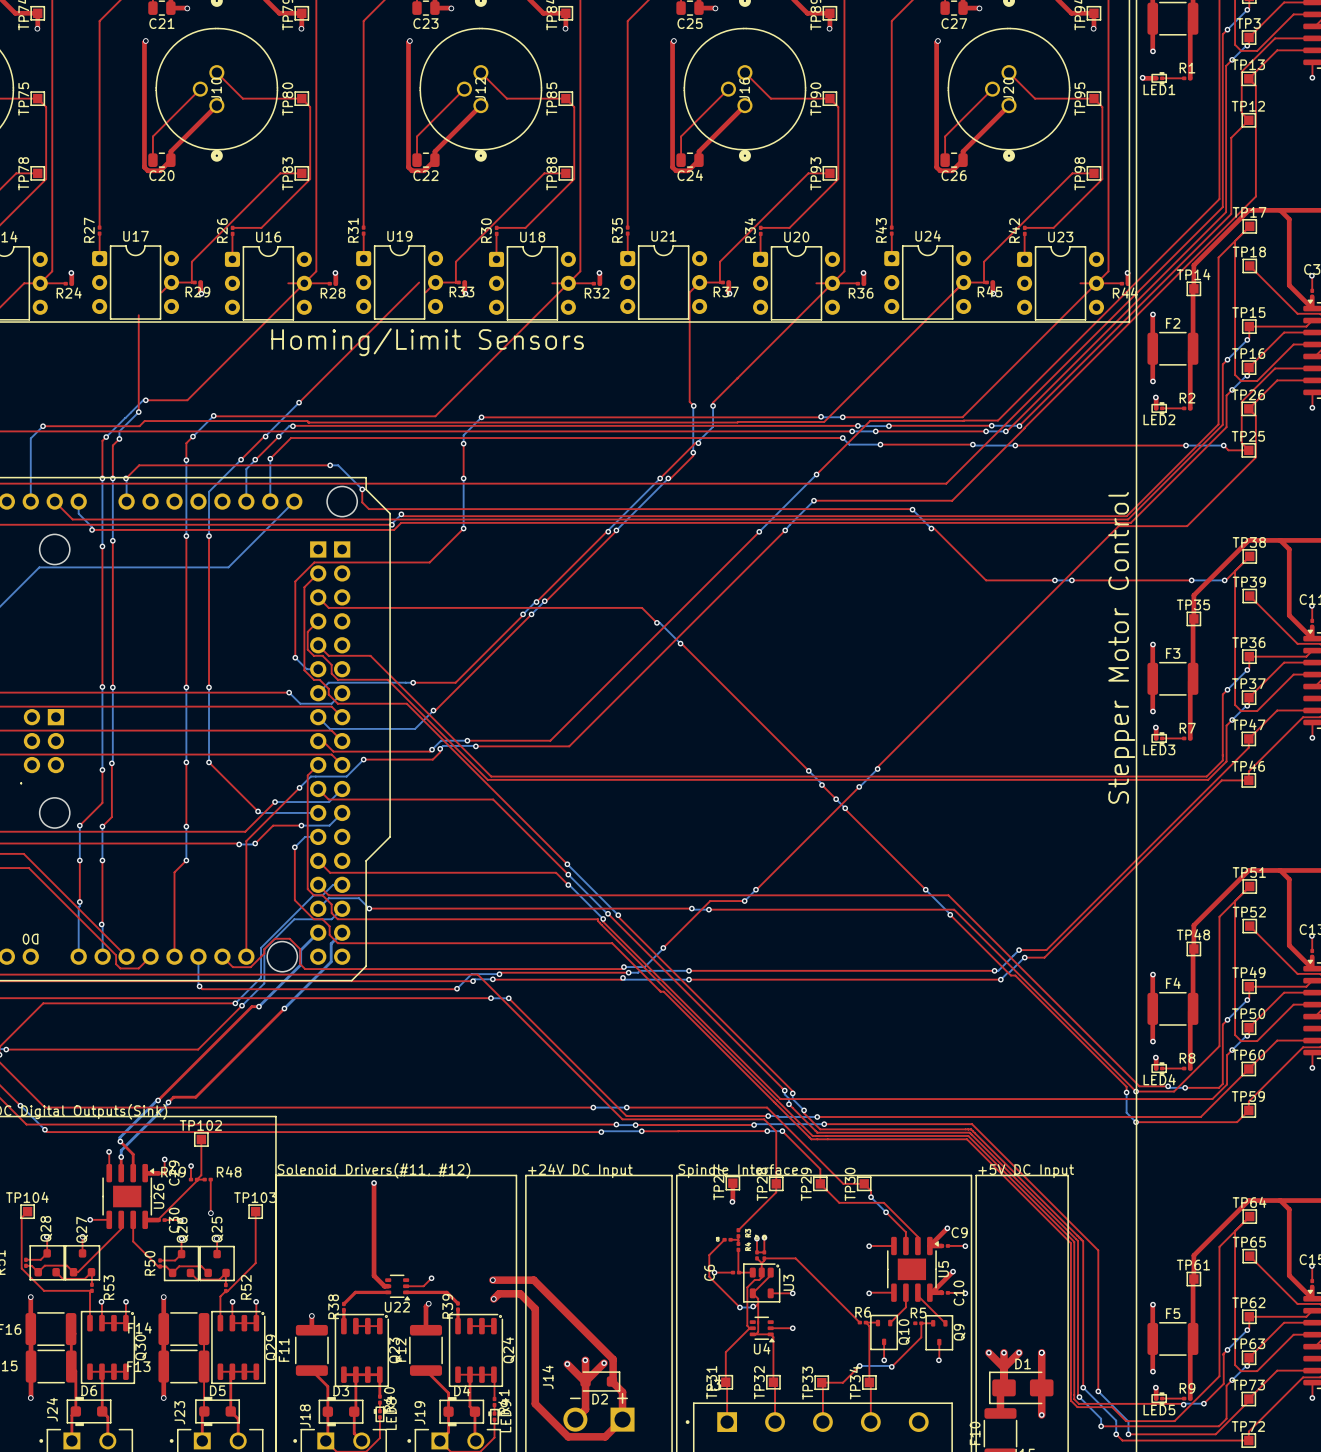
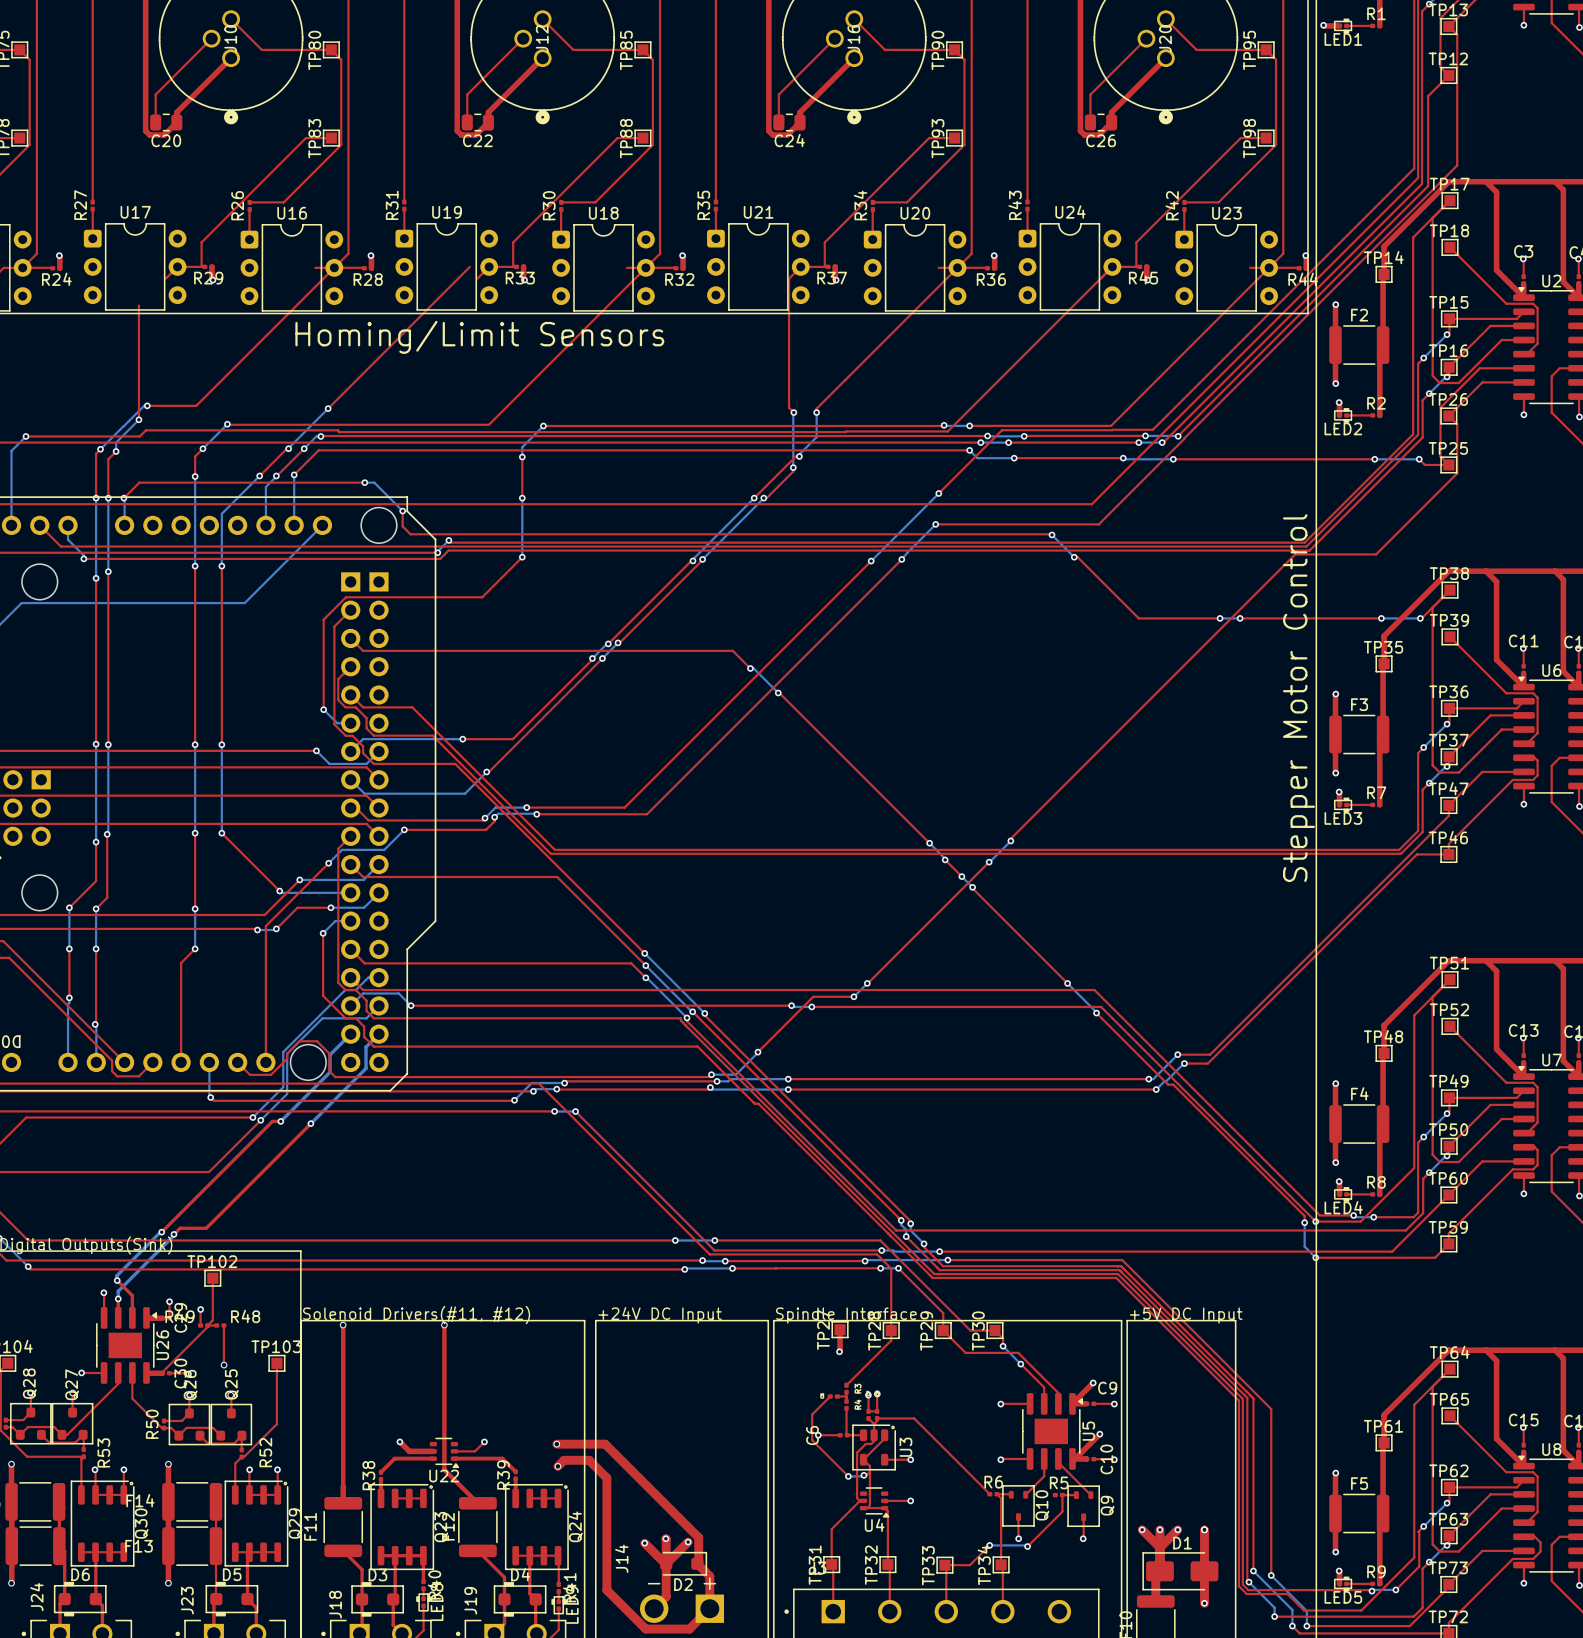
top track: none -> (343, 1325) (343, 1486)
via: none -> (343, 1325)
via: none -> (444, 1325)
top track: (374, 1183) (374, 1275) (384, 1286) -> (399, 1441) (409, 1451) (428, 1451)
via: (374, 1183) -> none
via: none -> (399, 1441)
top track: (428, 1303) (425, 1306) (425, 1330) -> (444, 1325) (444, 1469) (477, 1503)
via: (428, 1303) -> none
via: (311, 1315) -> none

